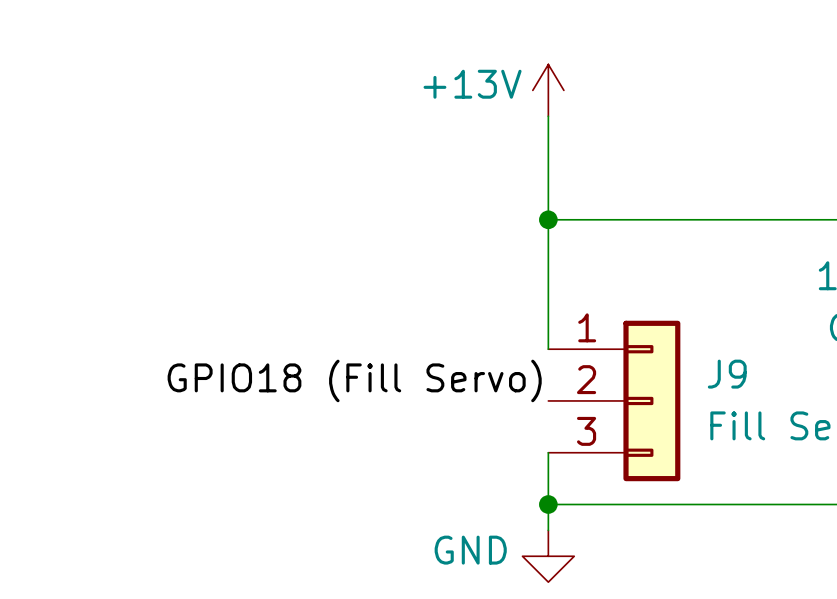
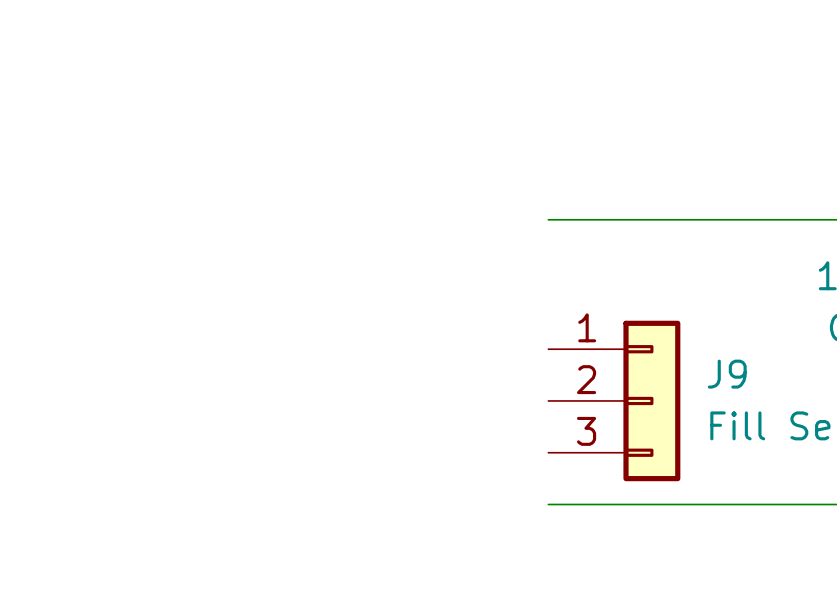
power symbol: +13V (548, 90) -> none
wire: (548, 116) (548, 349) -> none
junction: (548, 219) -> none
label: GPIO18 (Fill Servo) (354, 380) -> none
wire: (548, 452) (548, 530) -> none
junction: (548, 504) -> none
power symbol: GND (548, 556) -> none

